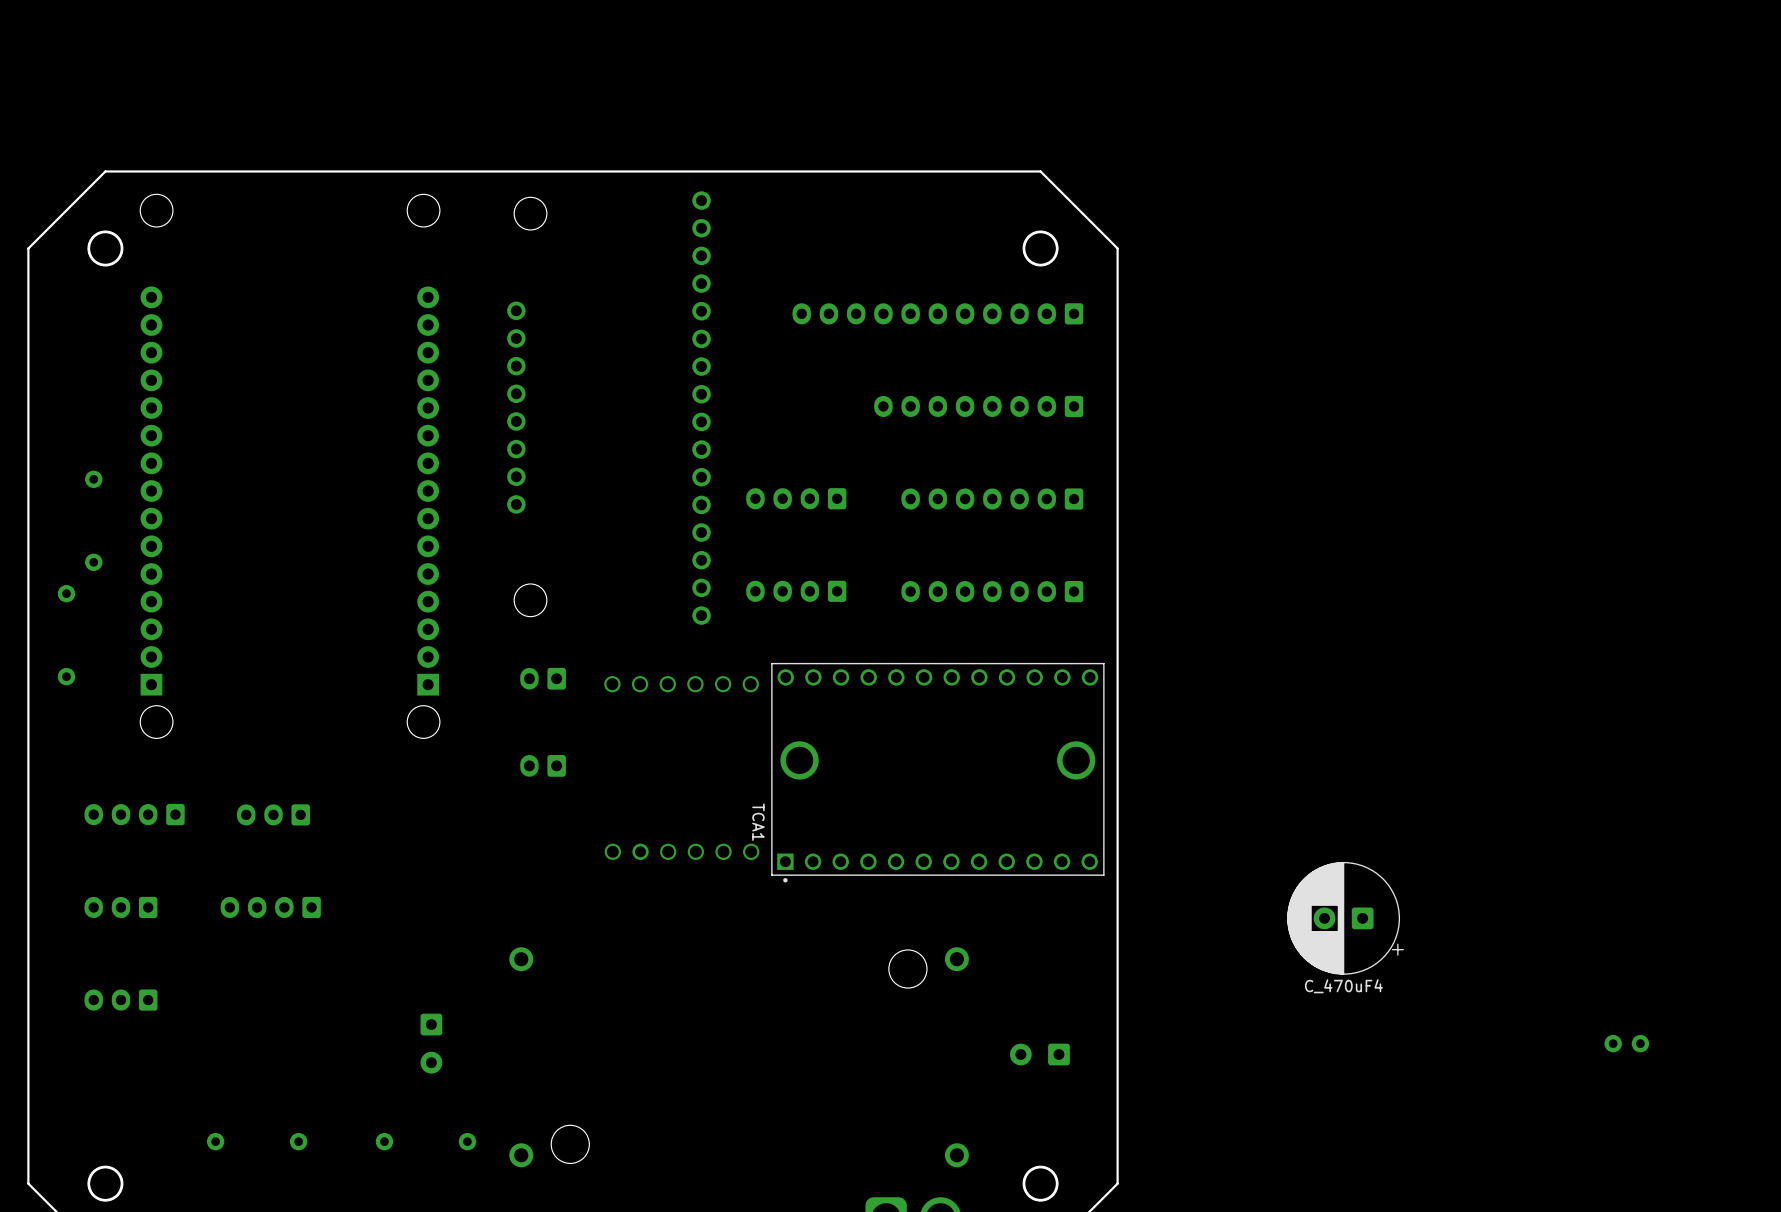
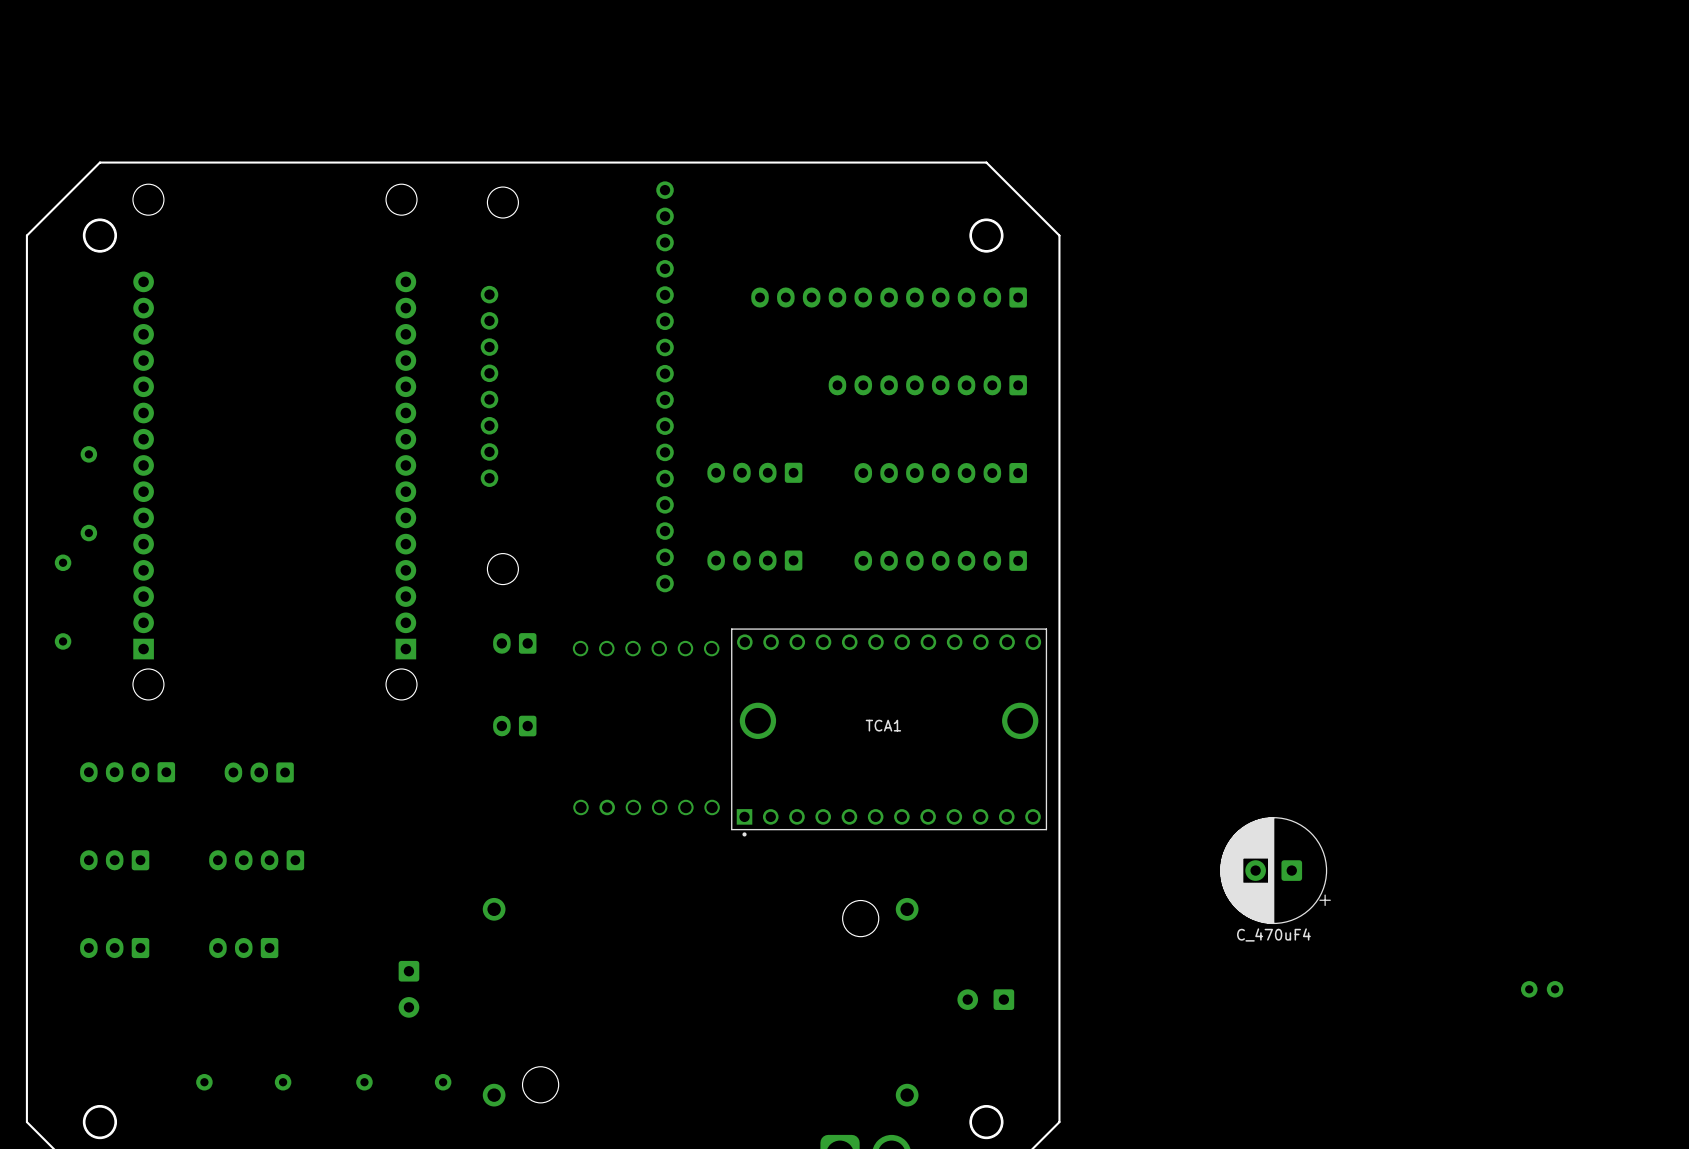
TCA1 name rotation: 0° (758, 822) -> 90° counterclockwise (883, 725)
TCA1 name position: TCA1 (758, 822) -> TCA1 (883, 725)
part: none -> (243, 948)

